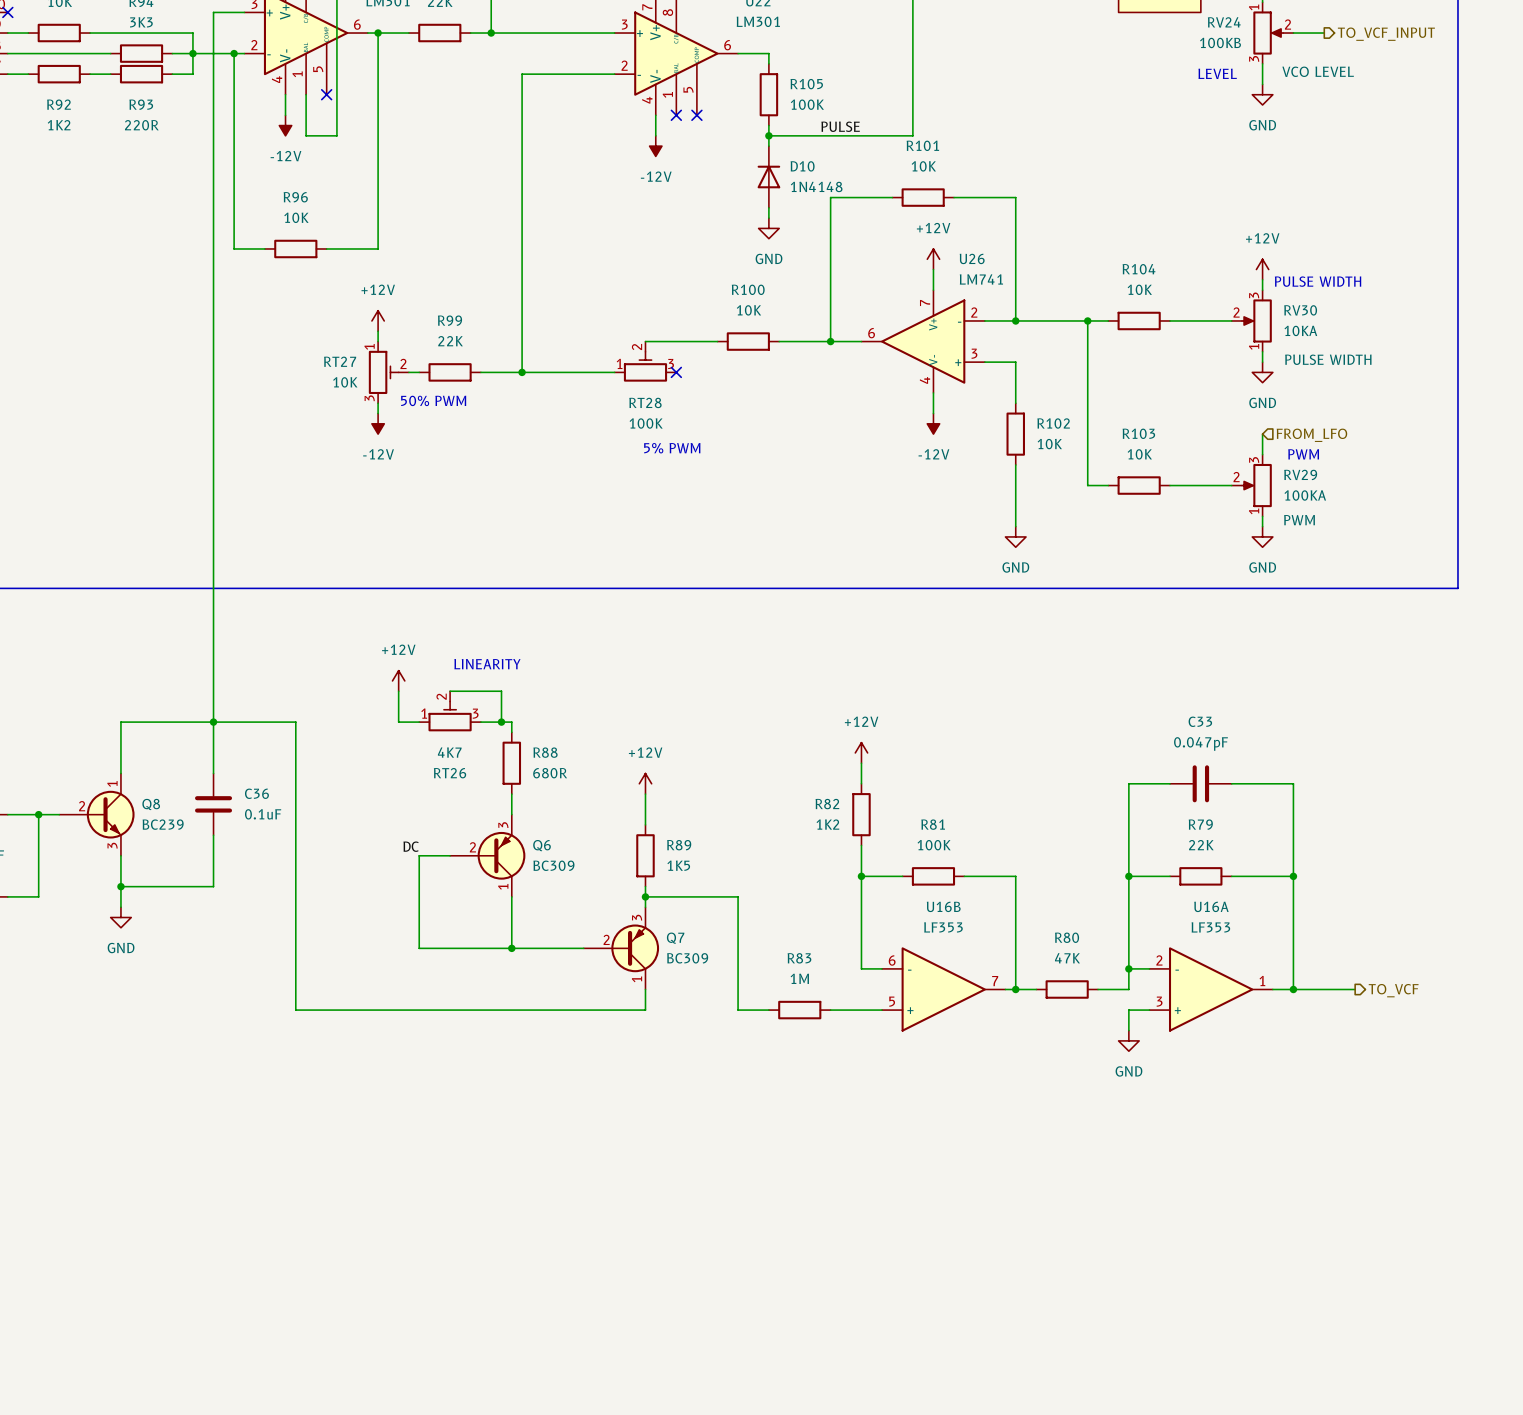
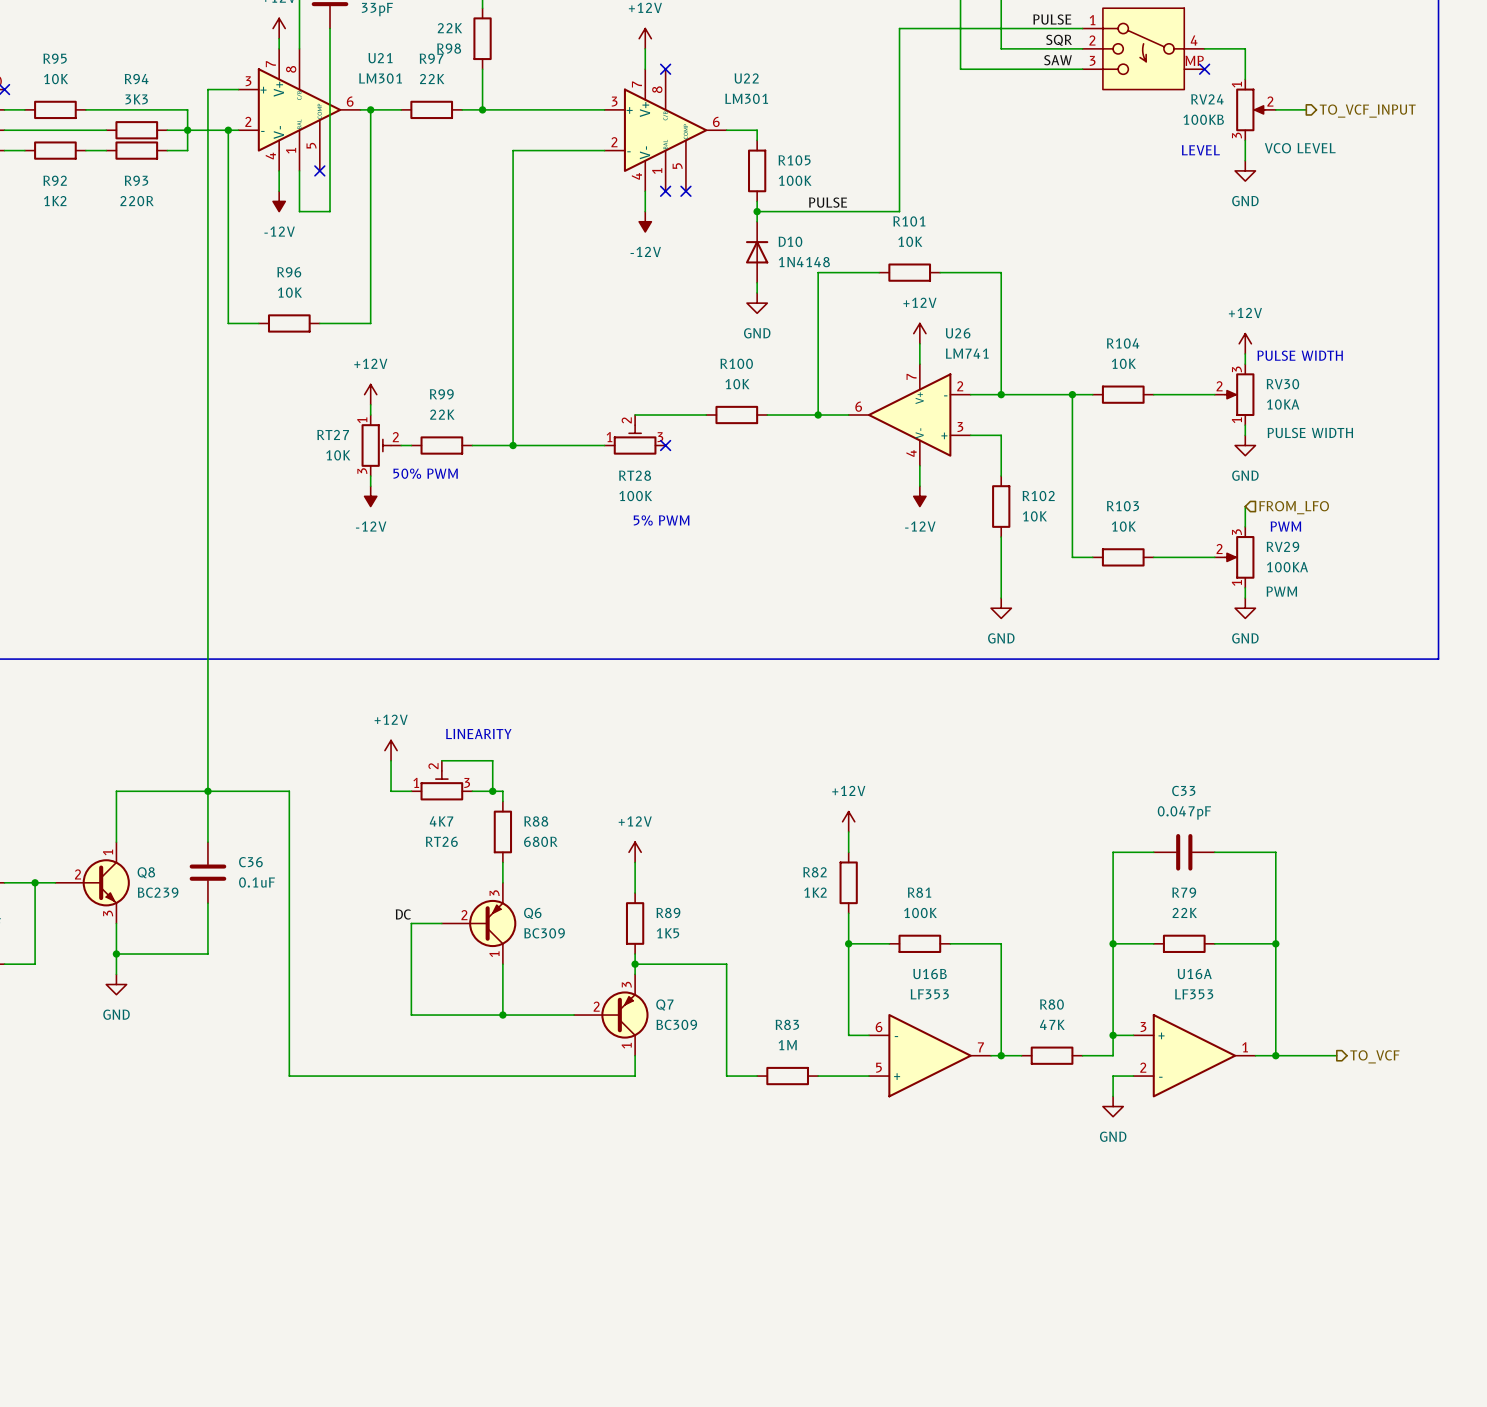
U16A flip: as is (1211, 989) -> up-down (1194, 1055)

